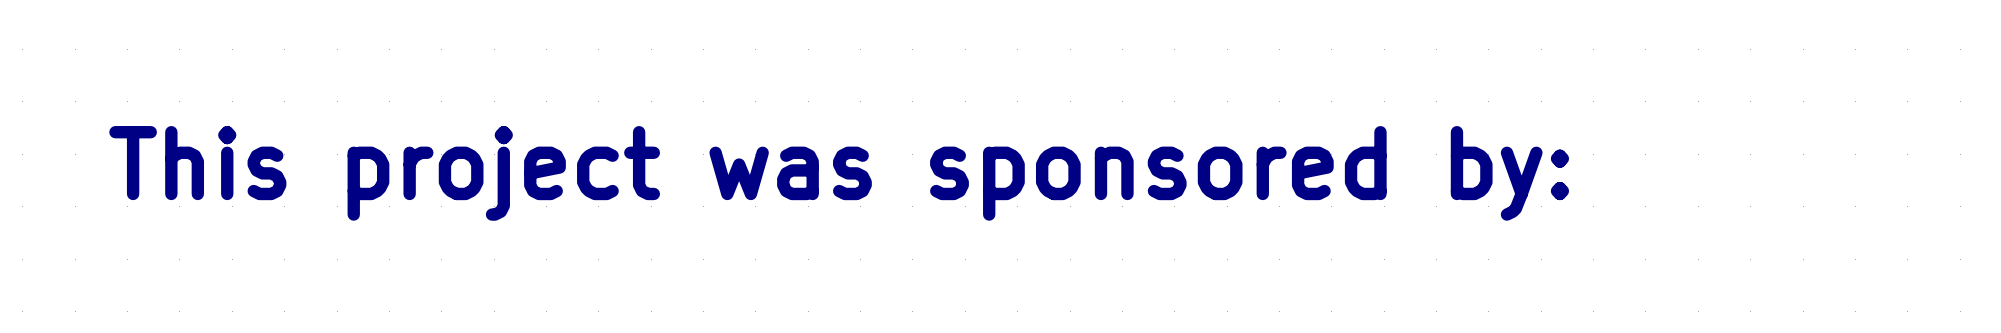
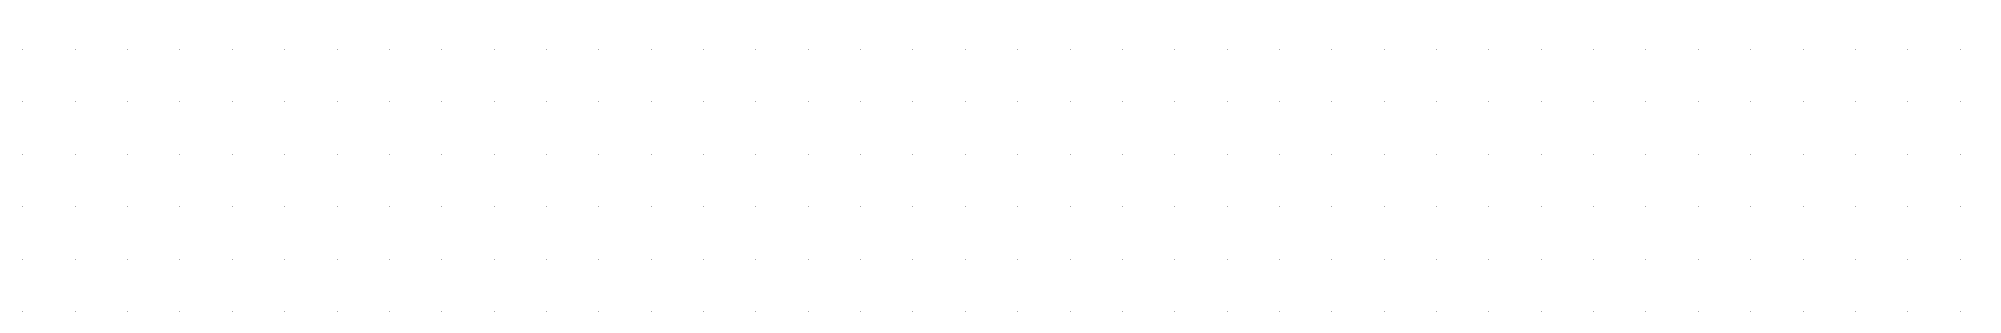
text: This project was sponsored by: (839, 173) -> none

